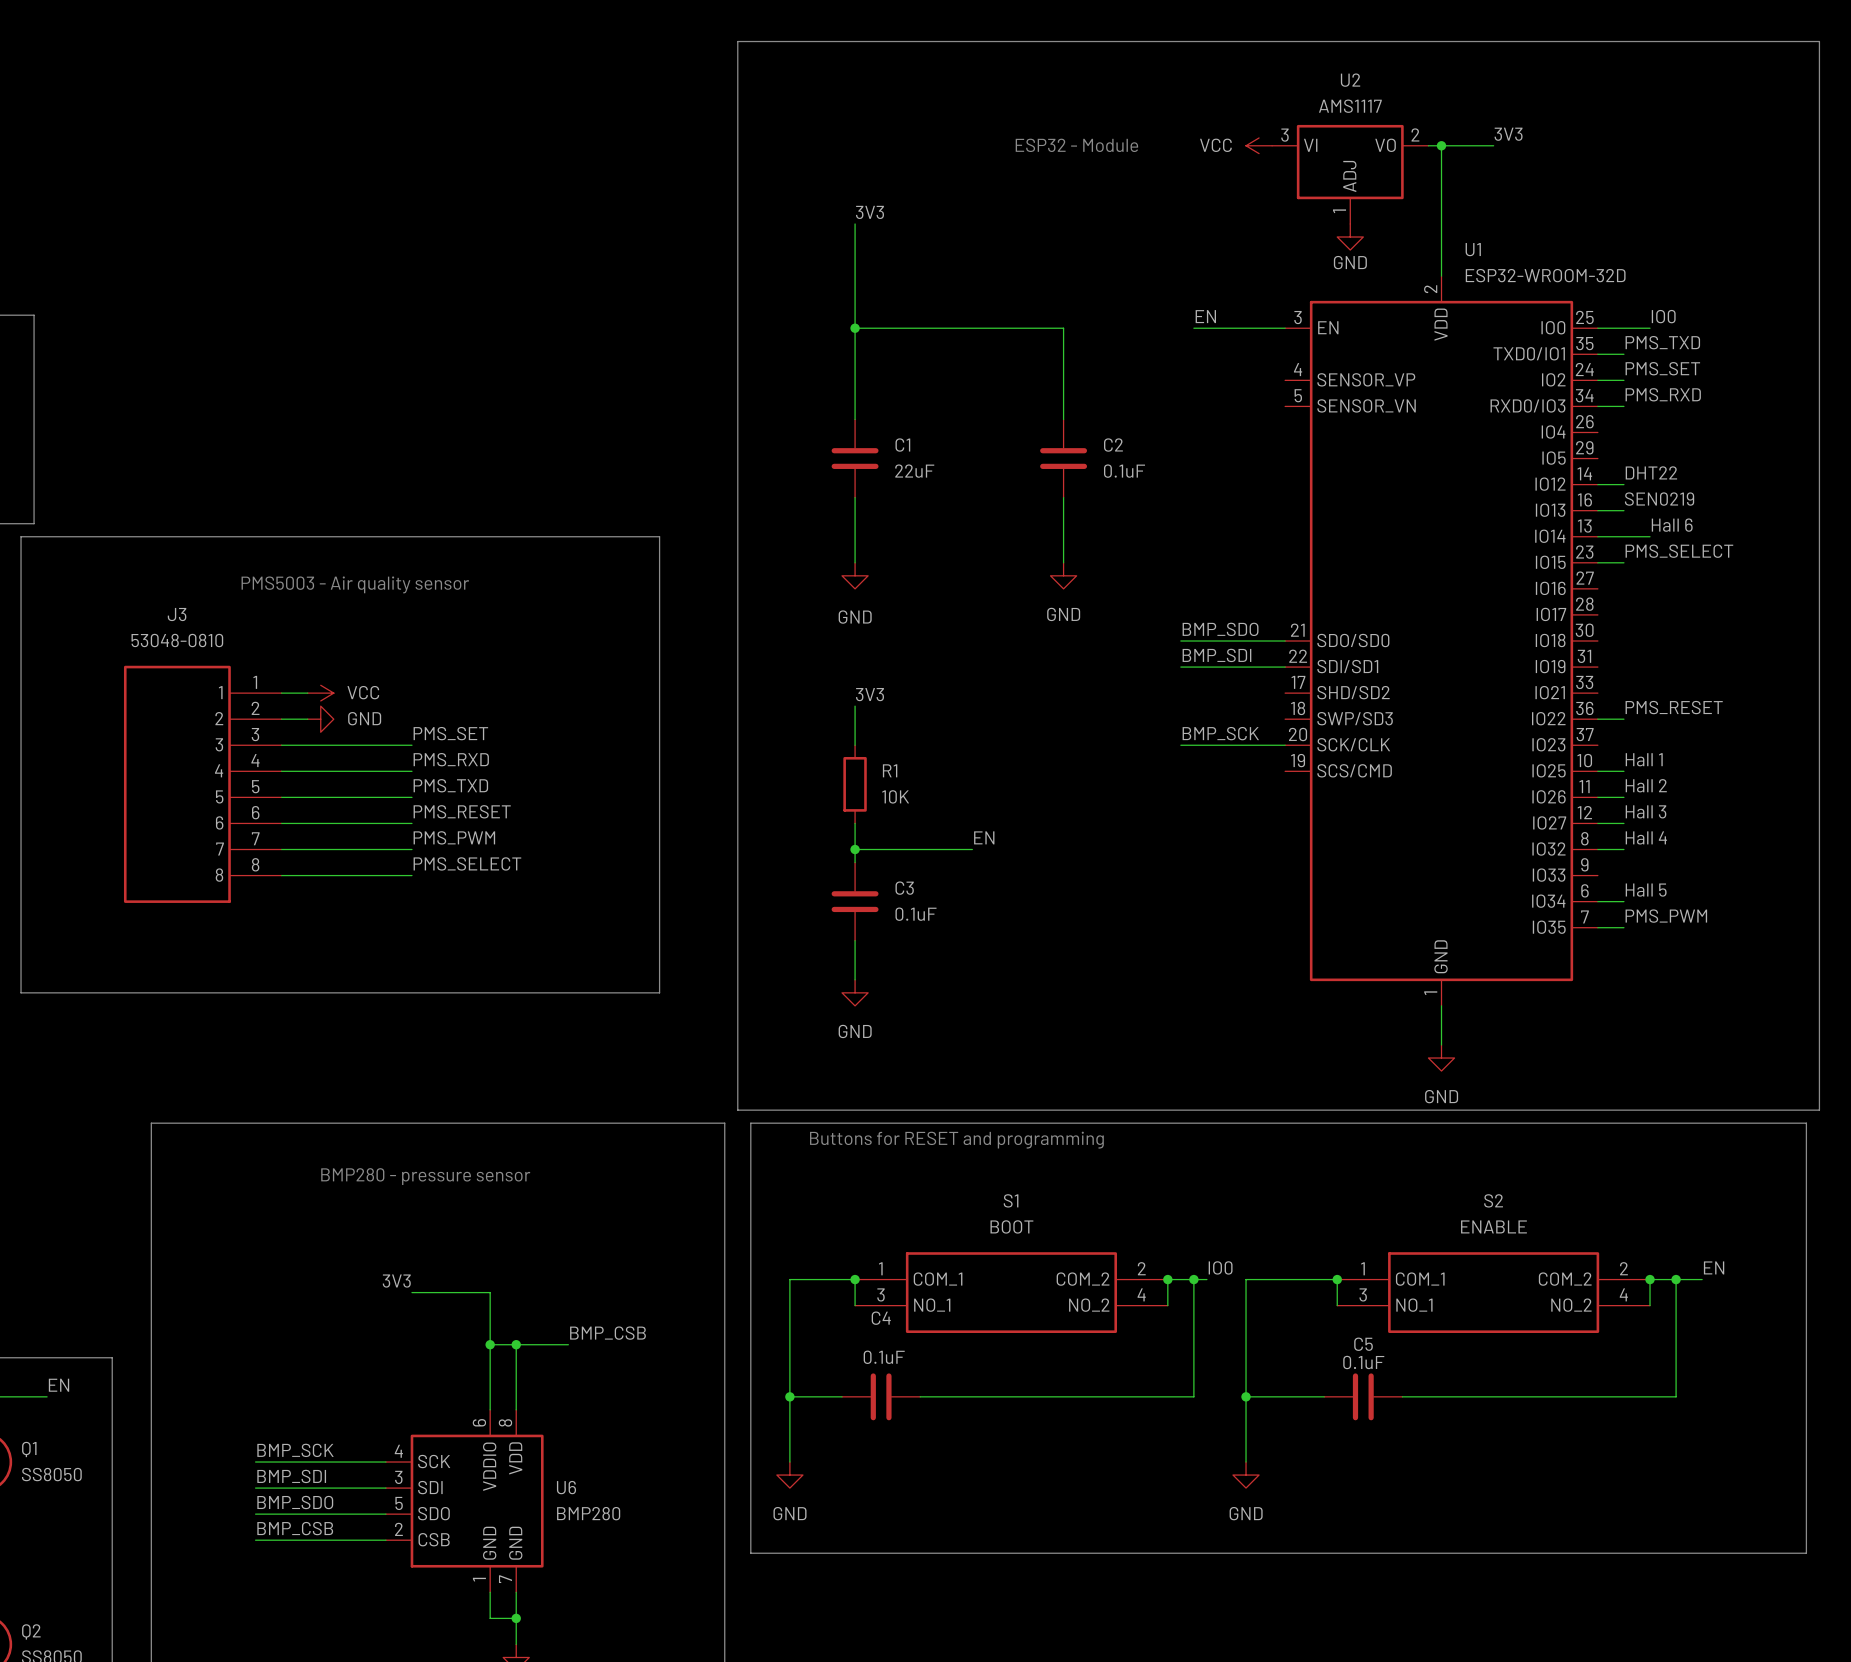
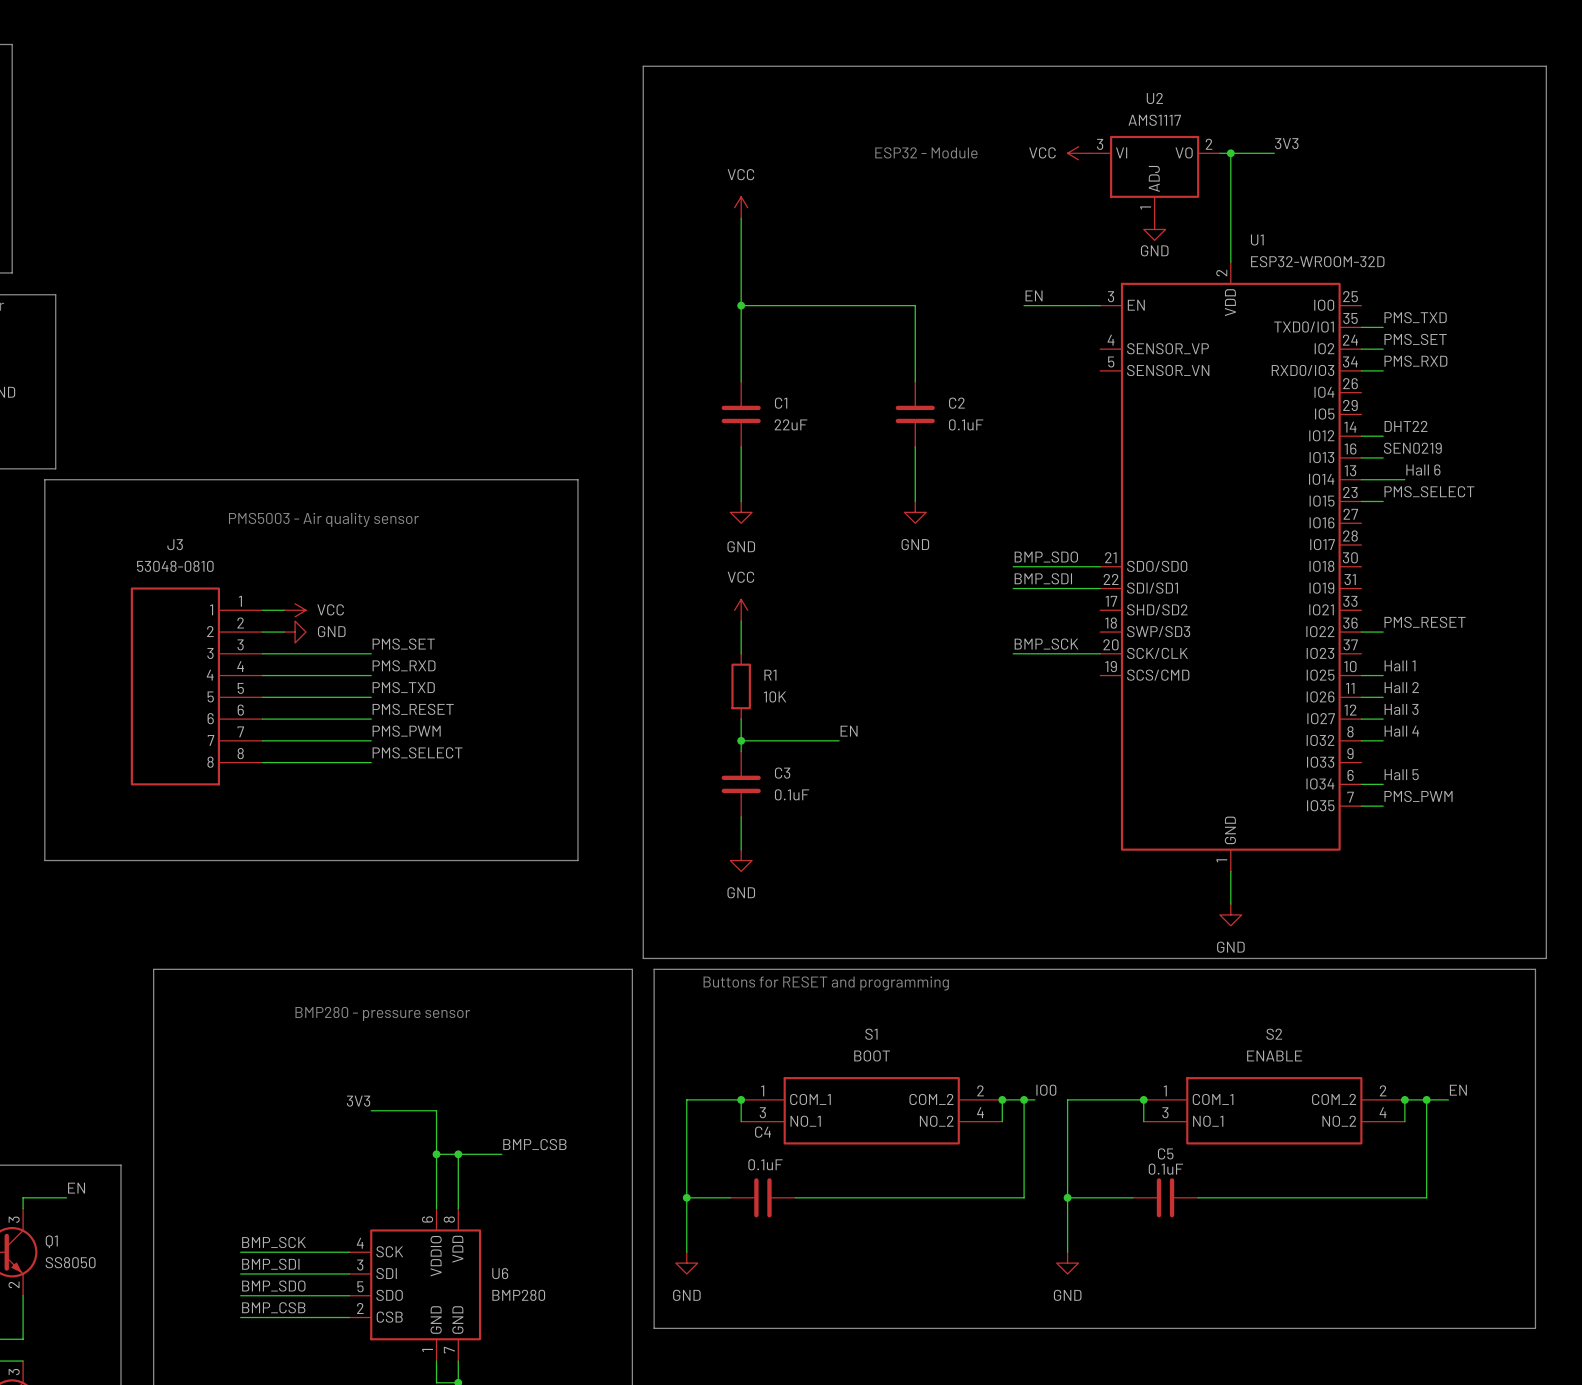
power symbol: none -> VCC (741, 207)
label: 3V3 (869, 212) -> none
label: IO0 (1663, 316) -> none
wire: (1597, 328) (1650, 328) -> none
power symbol: none -> VCC (741, 610)
label: 3V3 (869, 694) -> none

